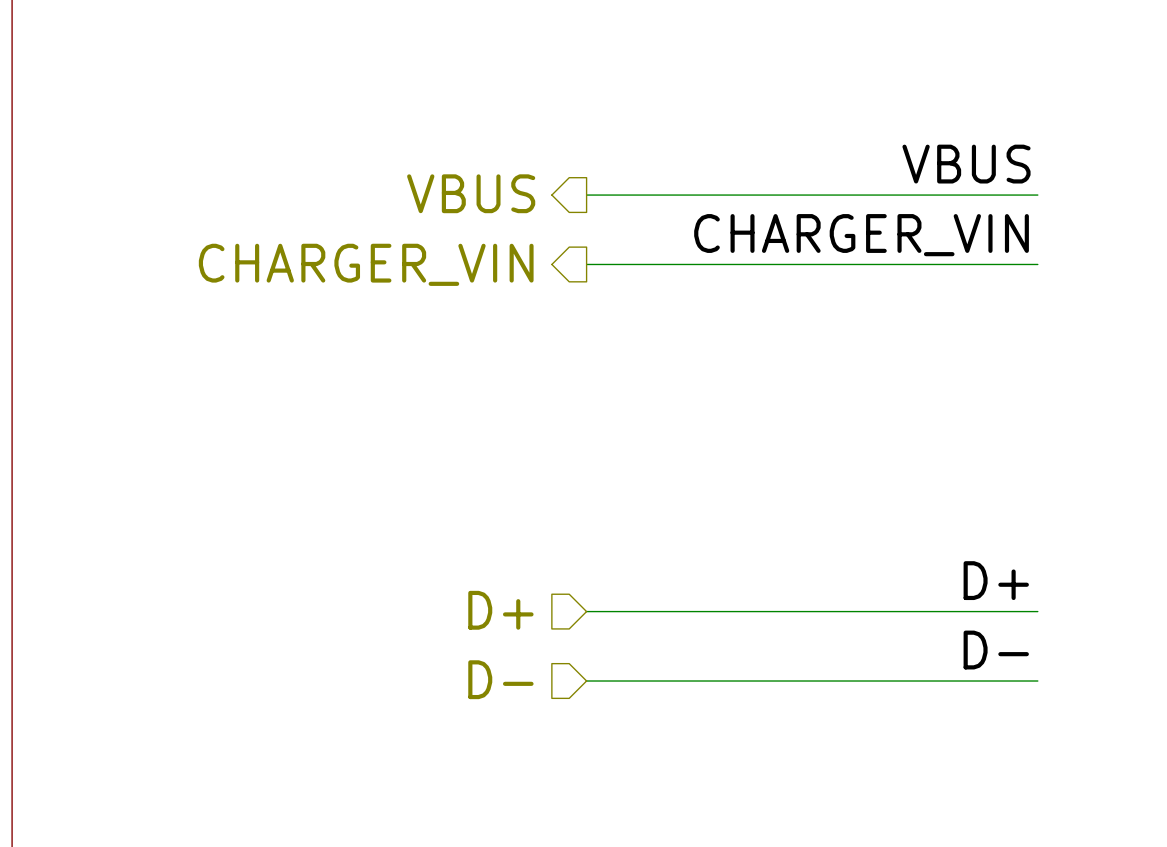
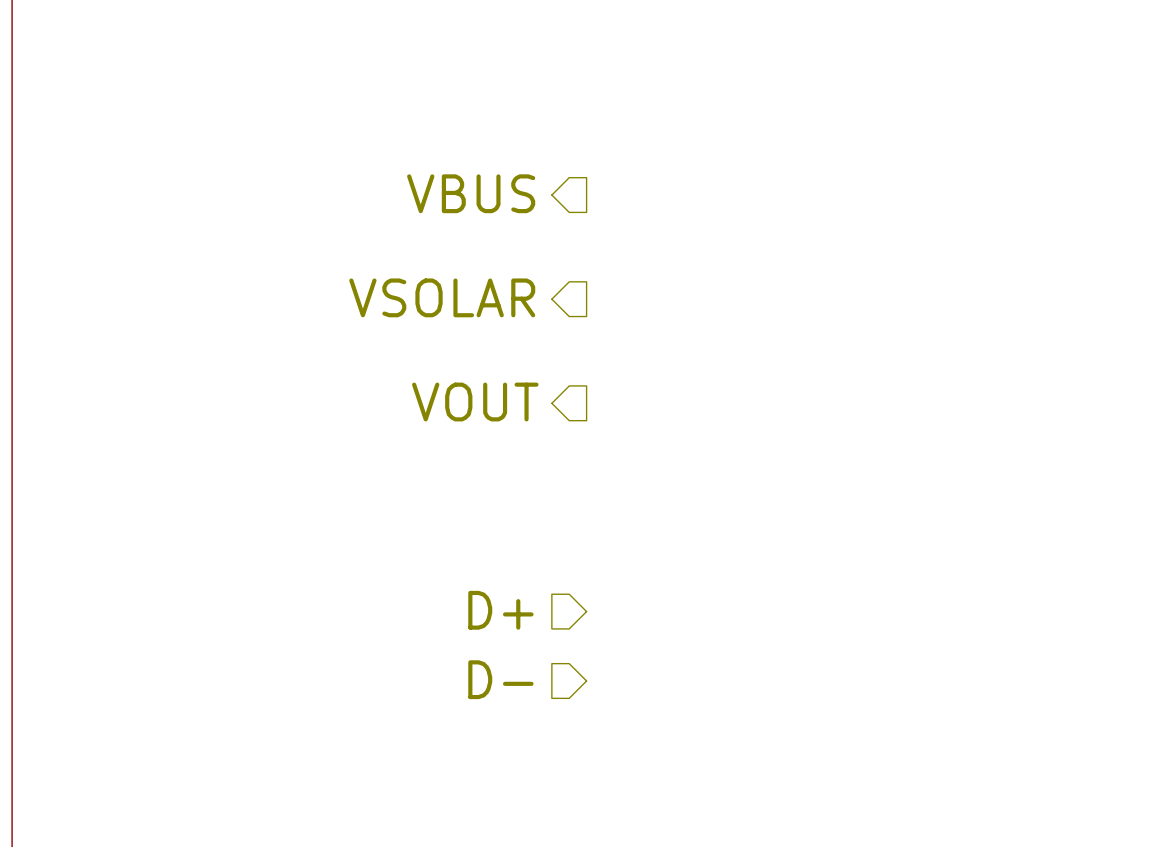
label: VBUS (966, 164) -> none
wire: (586, 195) (1037, 195) -> none
label: CHARGER_VIN (861, 235) -> none
hierarchical label: CHARGER_VIN (366, 264) -> none
wire: (586, 264) (1037, 264) -> none
hierarchical label: none -> VSOLAR (442, 297)
hierarchical label: none -> VOUT (475, 402)
label: D+ (996, 580) -> none
wire: (586, 611) (1037, 611) -> none
label: D- (996, 650) -> none
wire: (586, 681) (1037, 681) -> none

